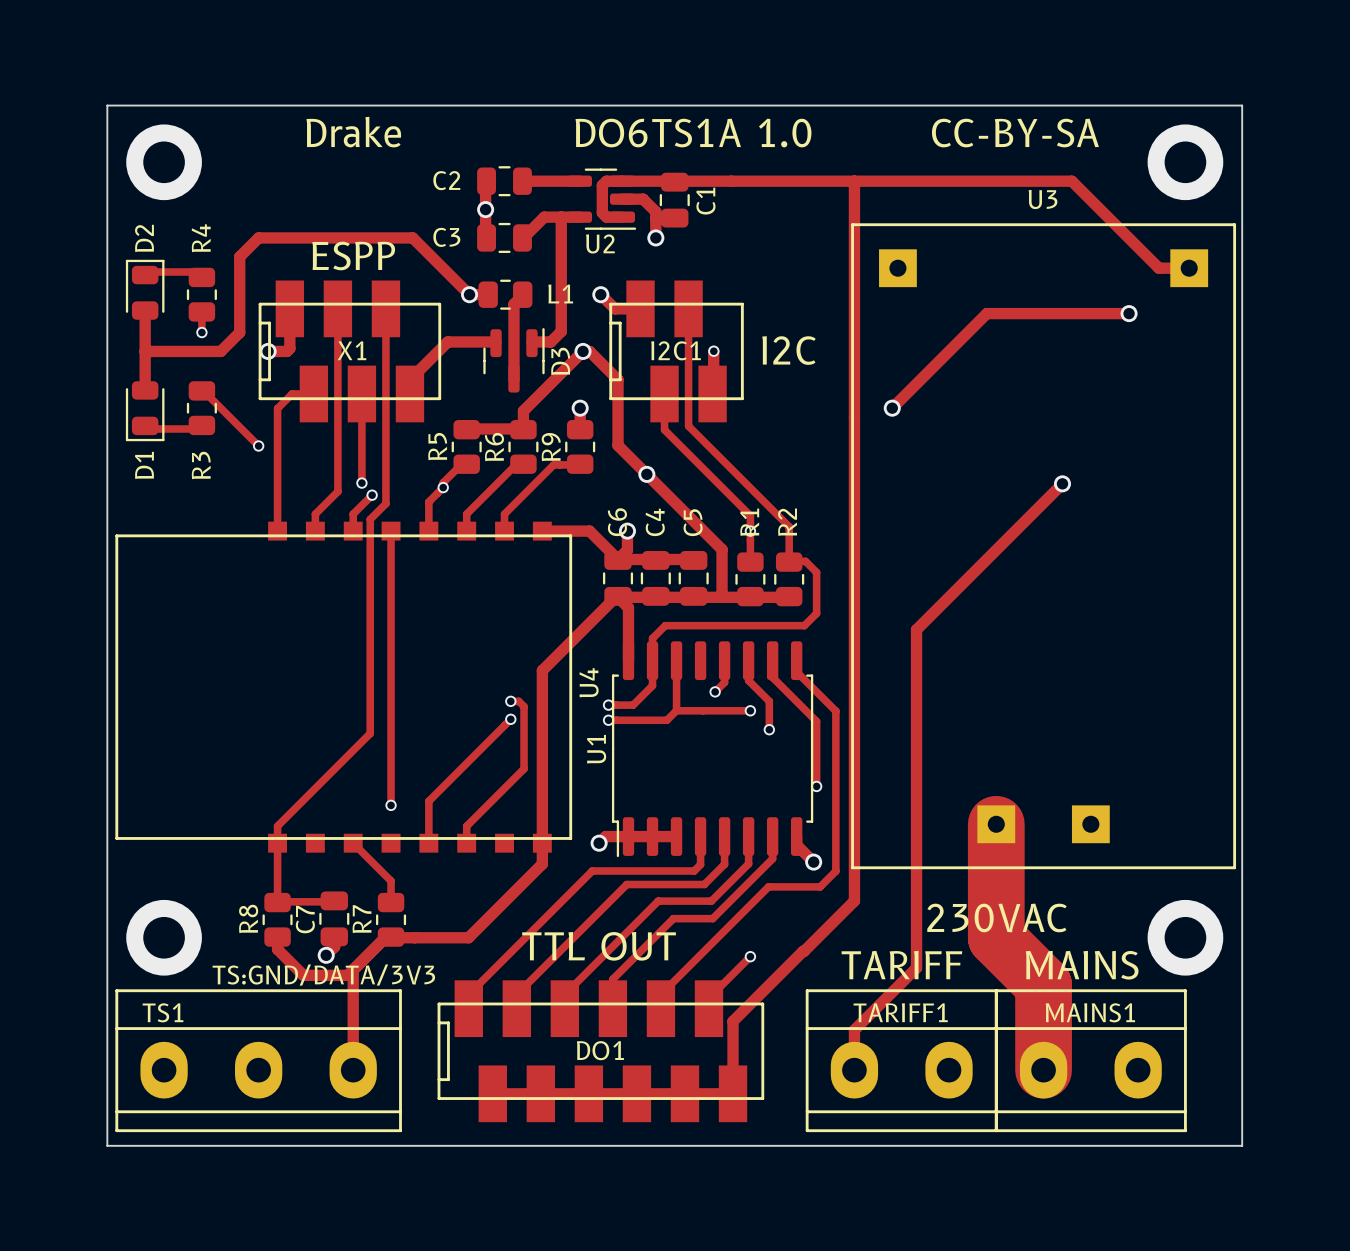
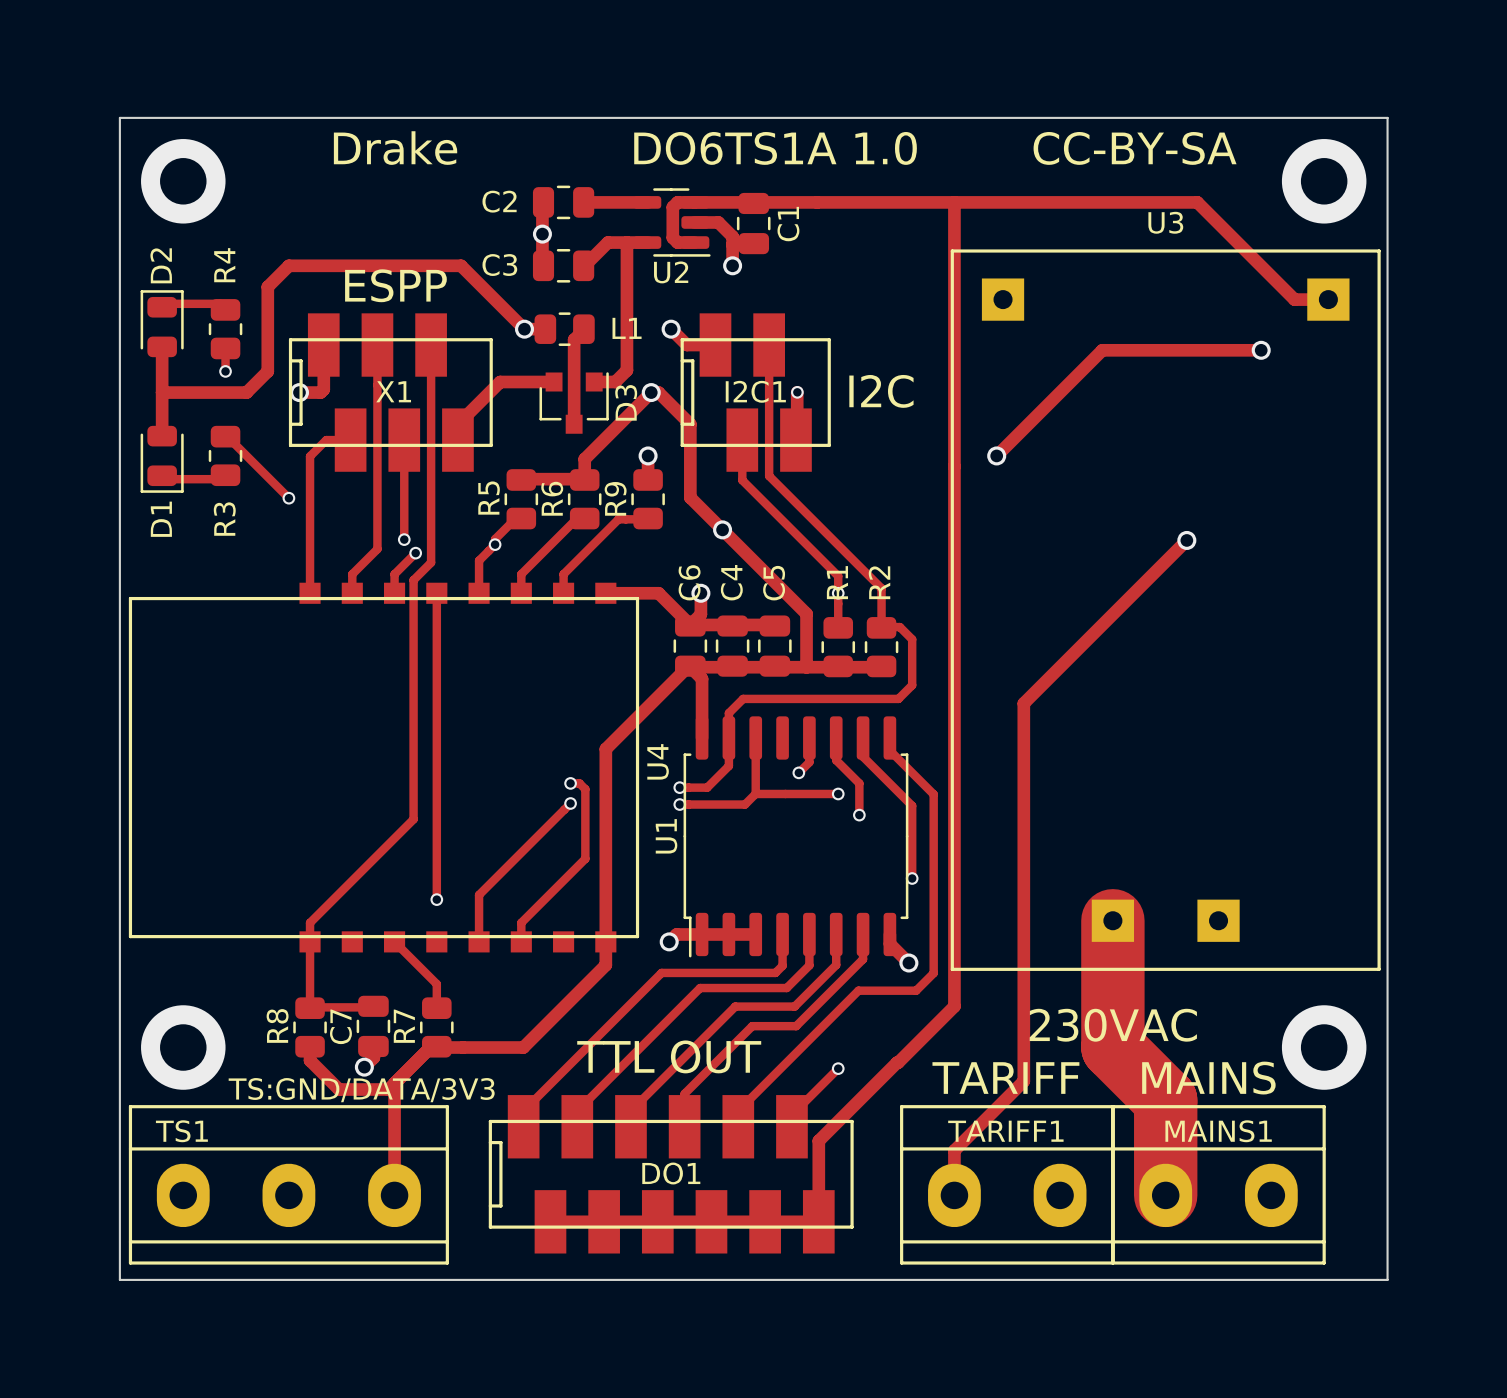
D3 footprint: [483, 328, 545, 393] -> [539, 372, 609, 434]

